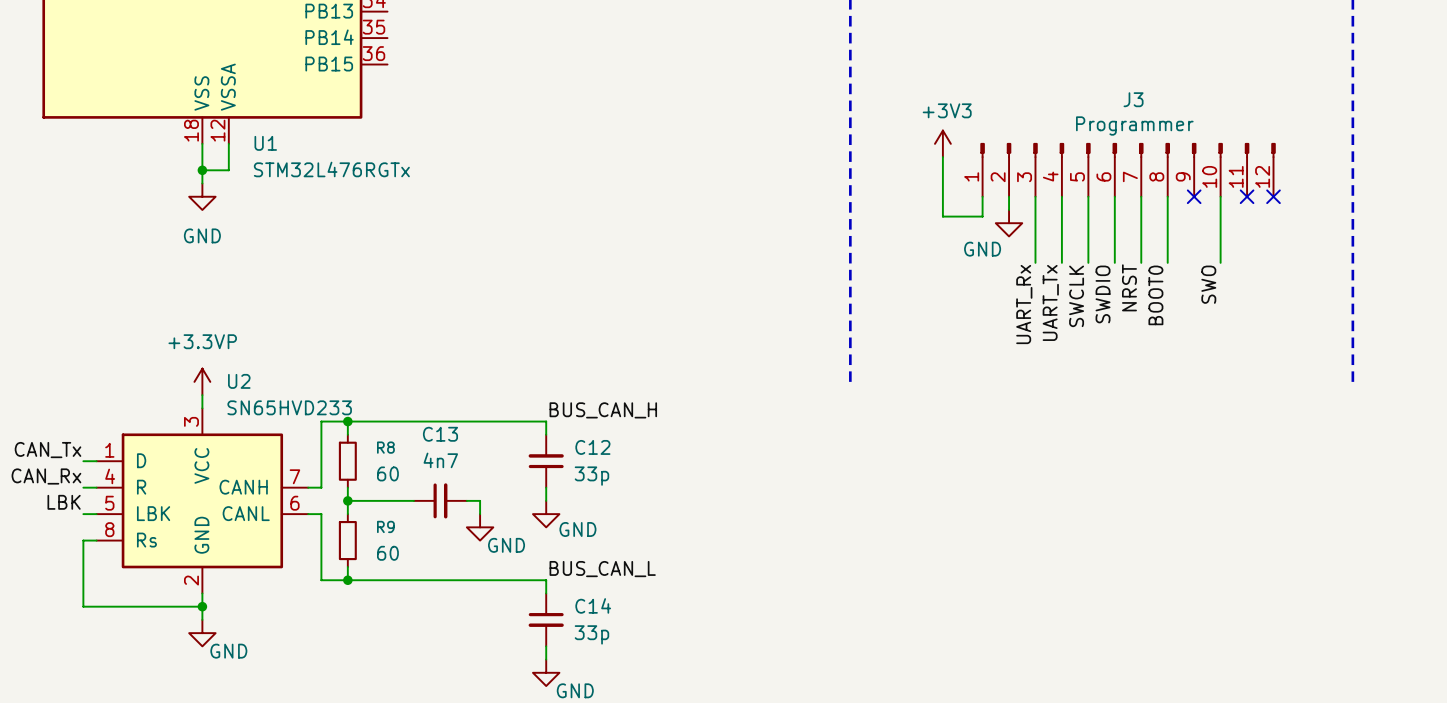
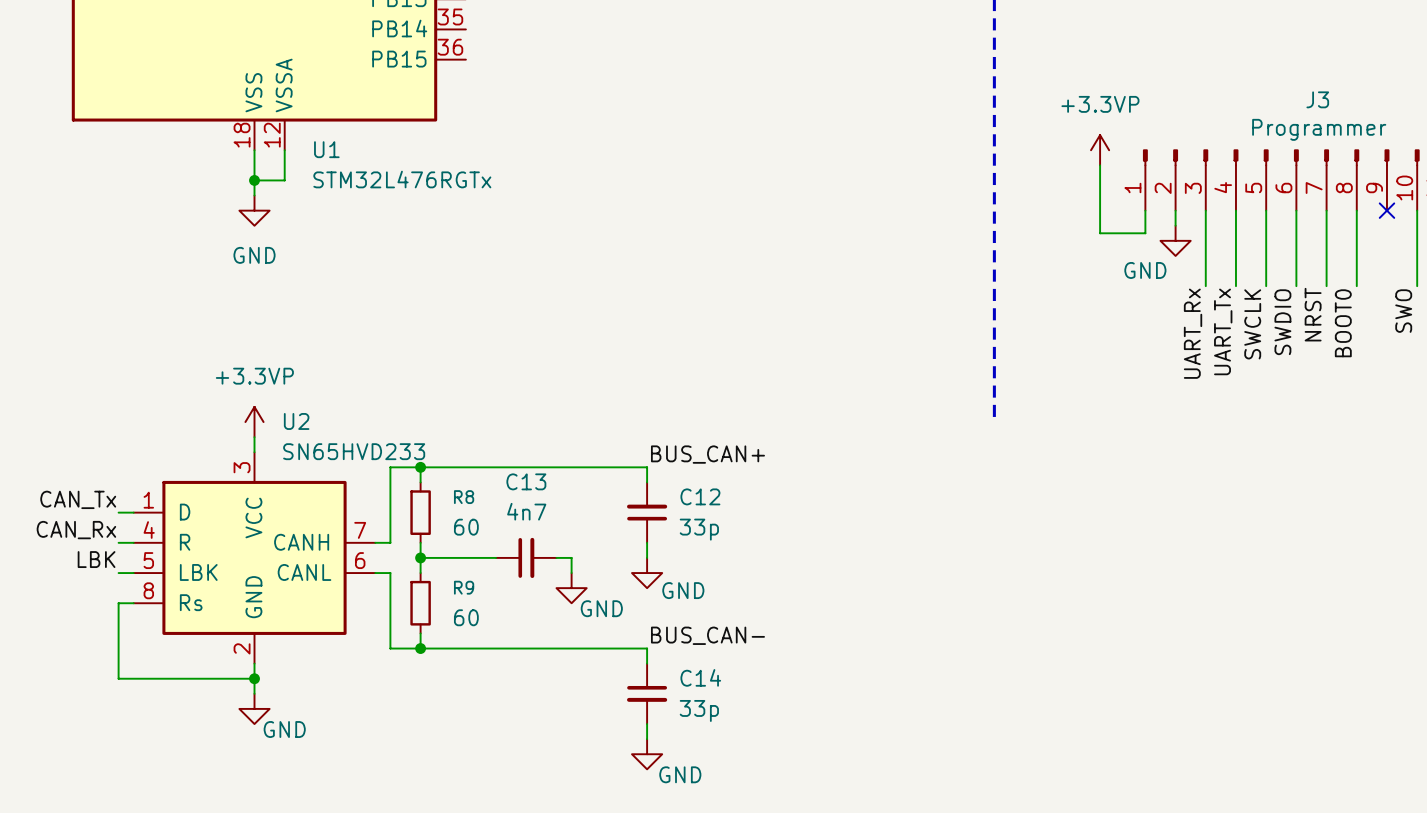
power symbol: +3V3 (942, 143) -> +3.3VP (1100, 150)
label: BUS_CAN_H (603, 410) -> BUS_CAN+ (707, 454)
label: BUS_CAN_L (602, 569) -> BUS_CAN- (707, 635)

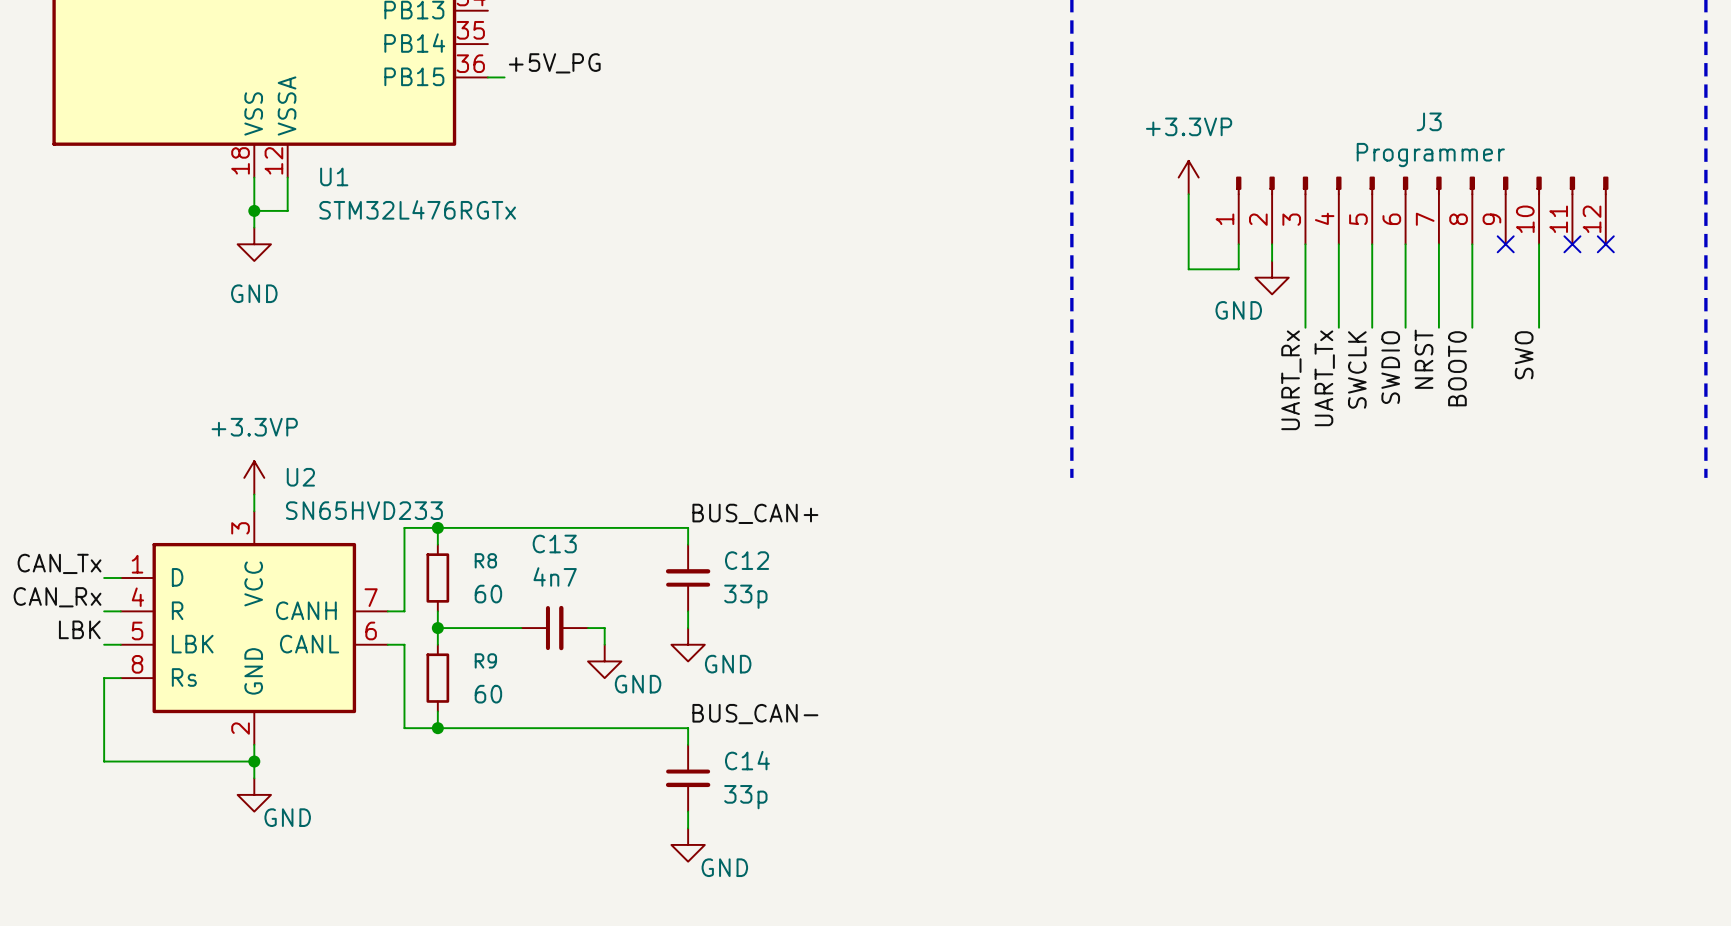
label: none -> +5V_PG (554, 63)
wire: none -> (487, 77) (504, 77)

